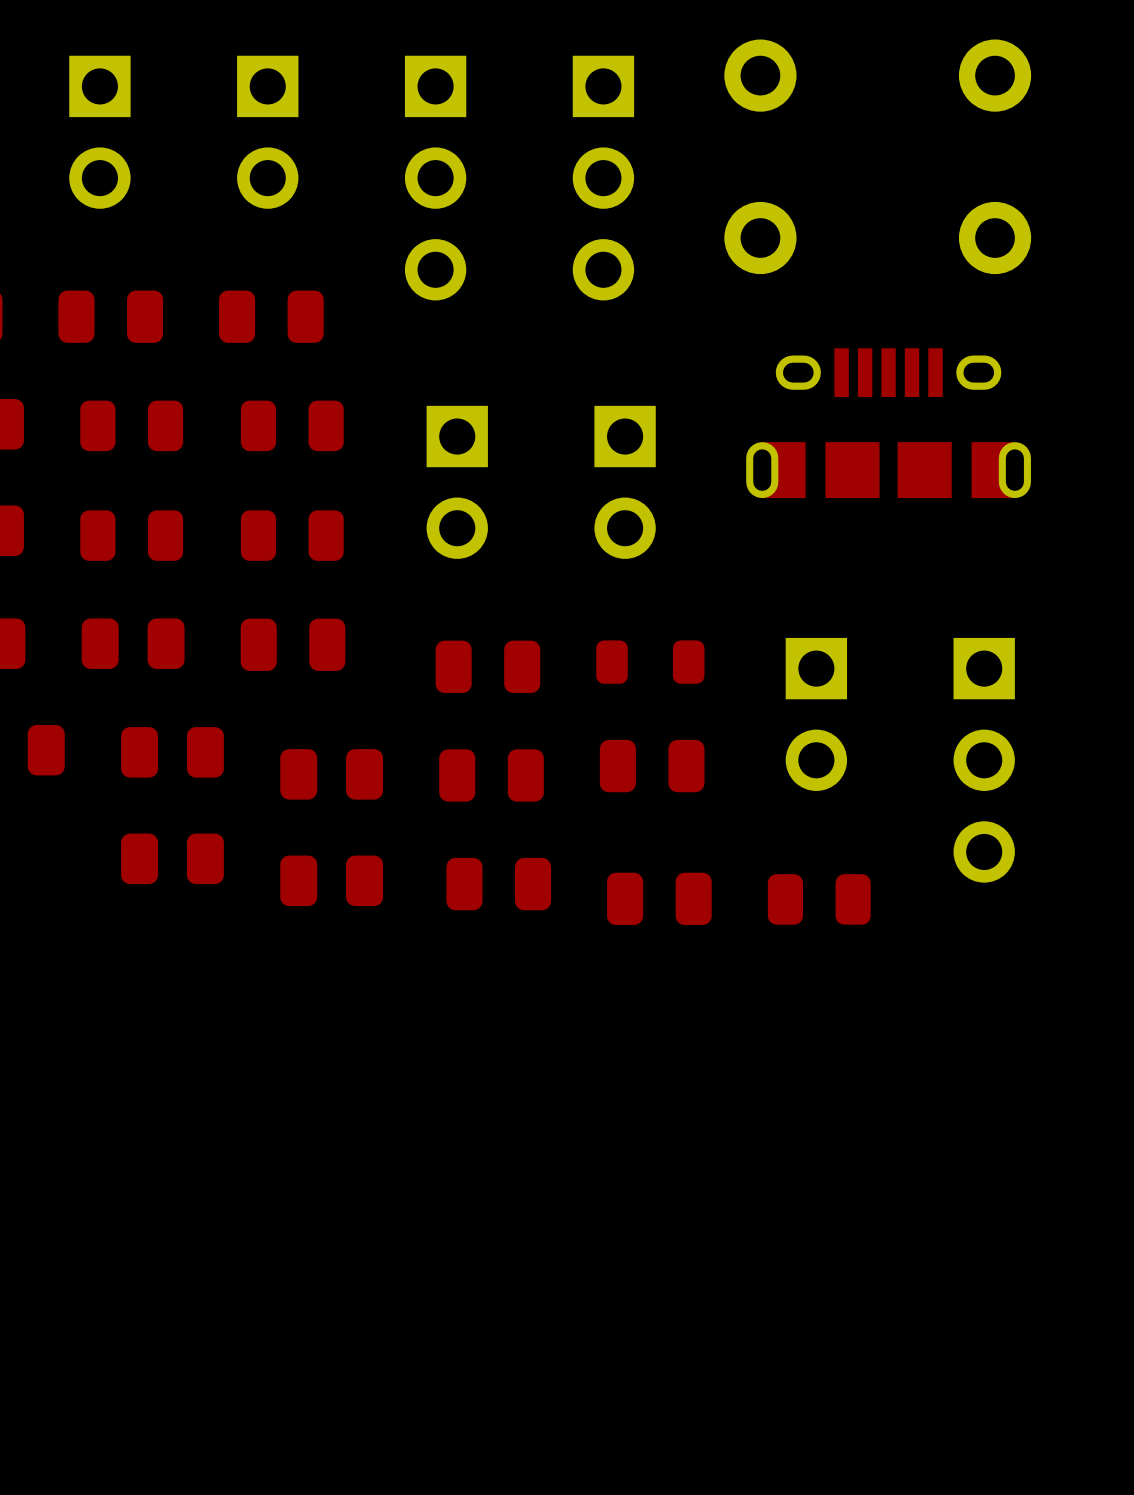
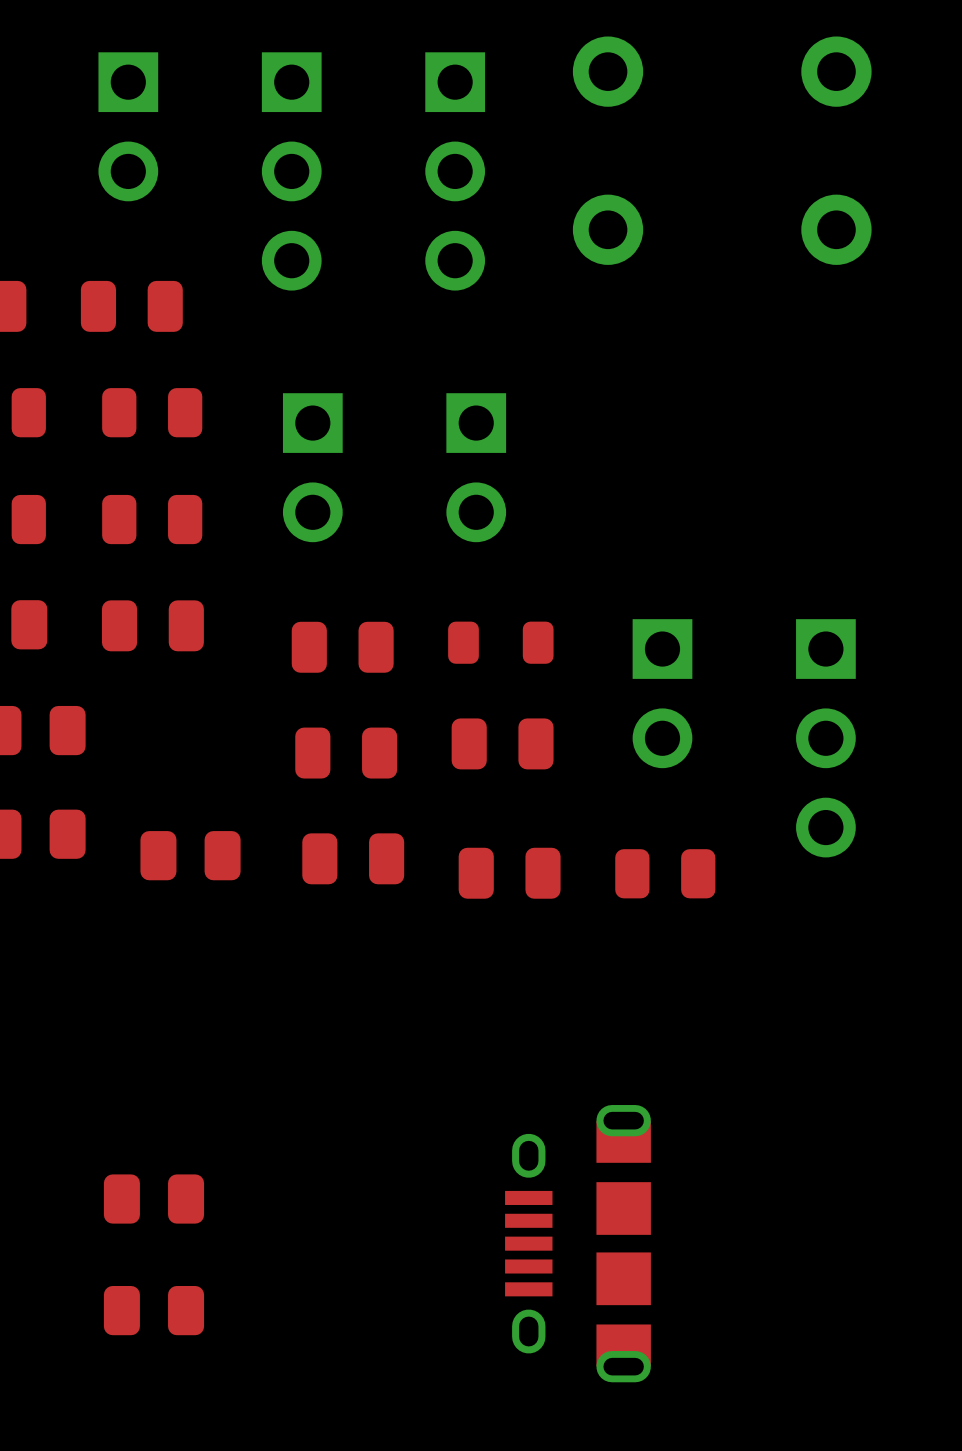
part rotation: 0° (888, 423) -> 90° counterclockwise (577, 1243)
part position: (888, 423) -> (577, 1243)
part: (331, 774) -> none
part: none -> (153, 1199)
part: none -> (153, 1310)

